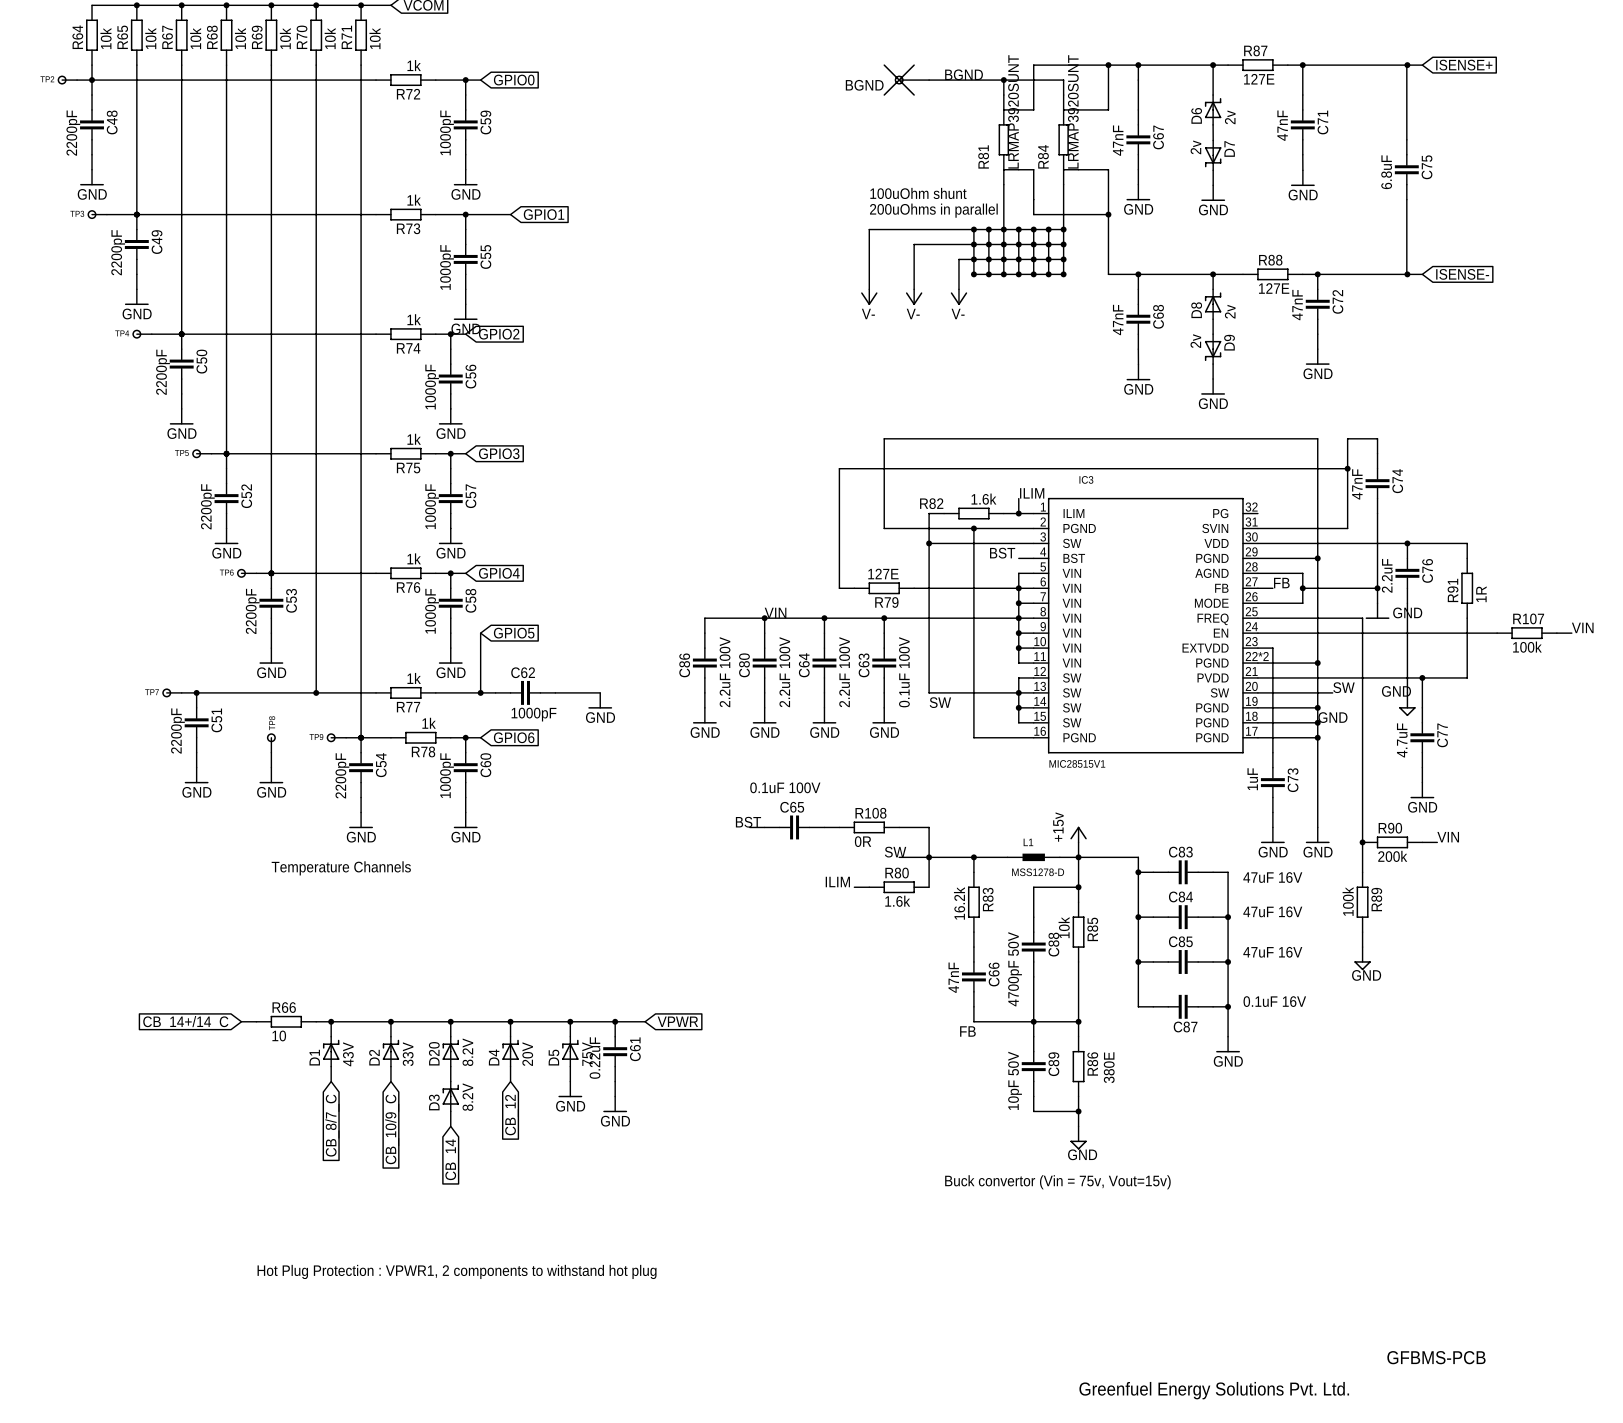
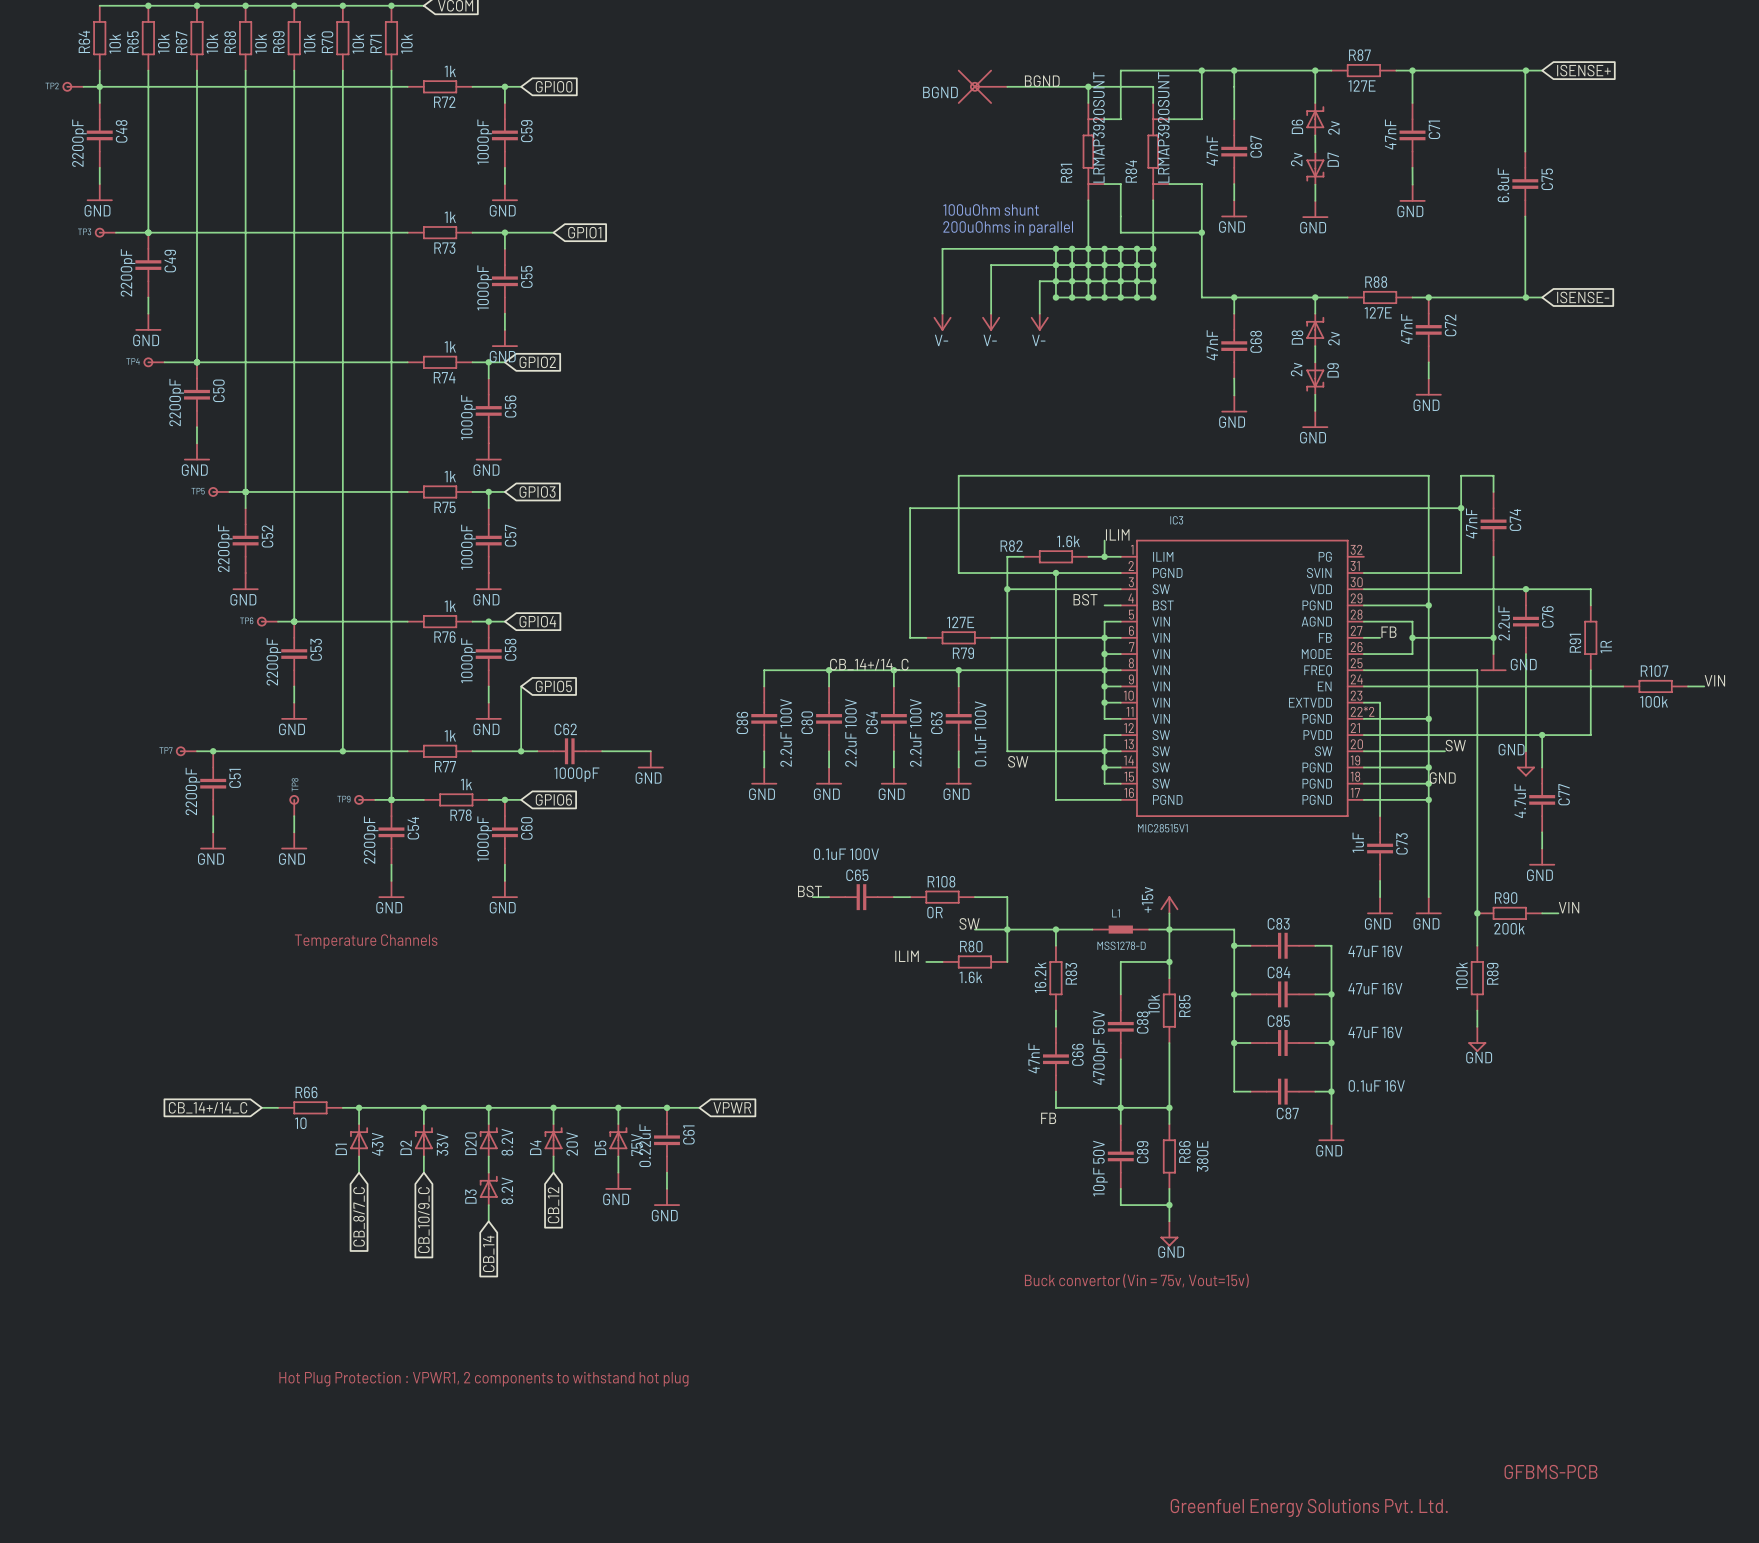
label: VIN (775, 612) -> CB_14+/14_C (869, 664)

